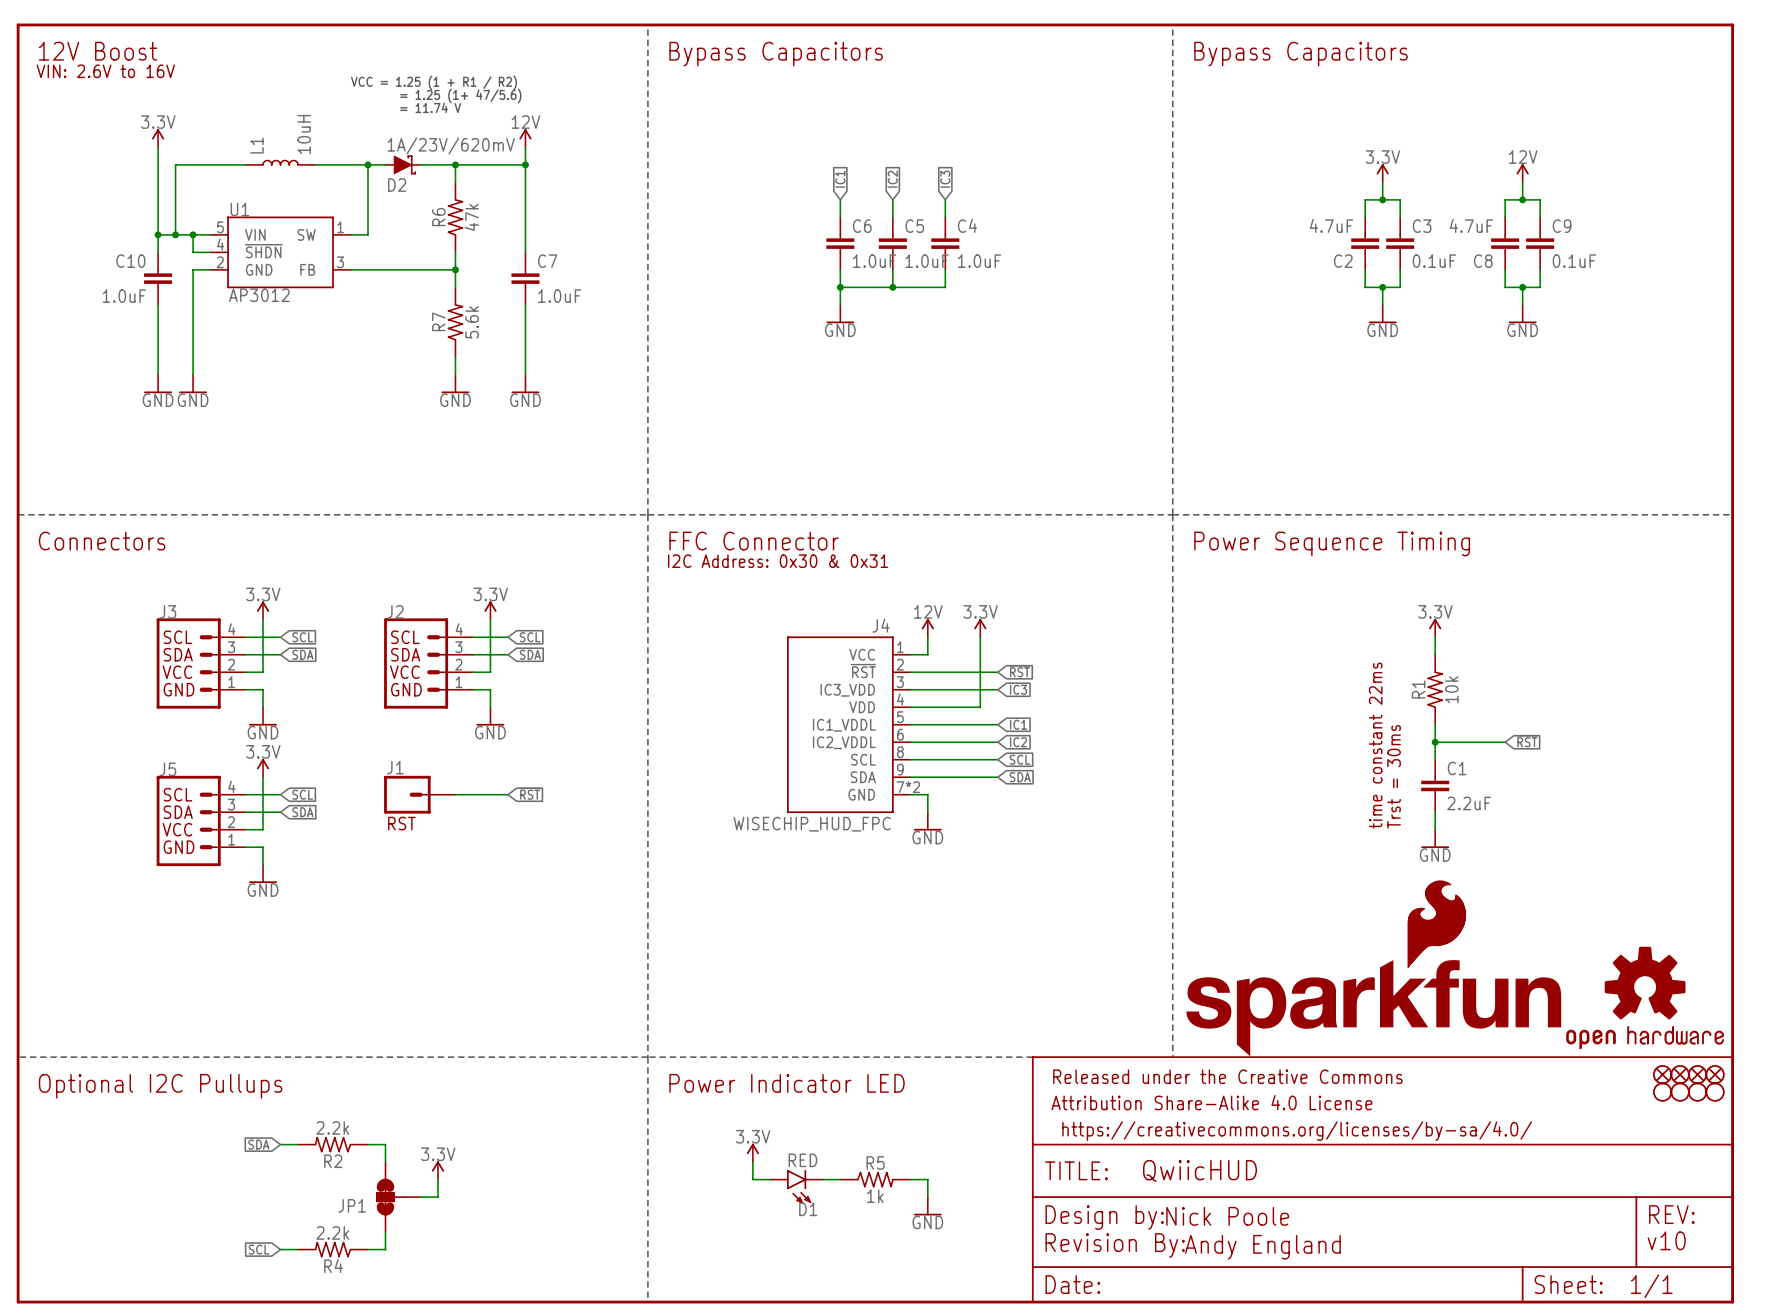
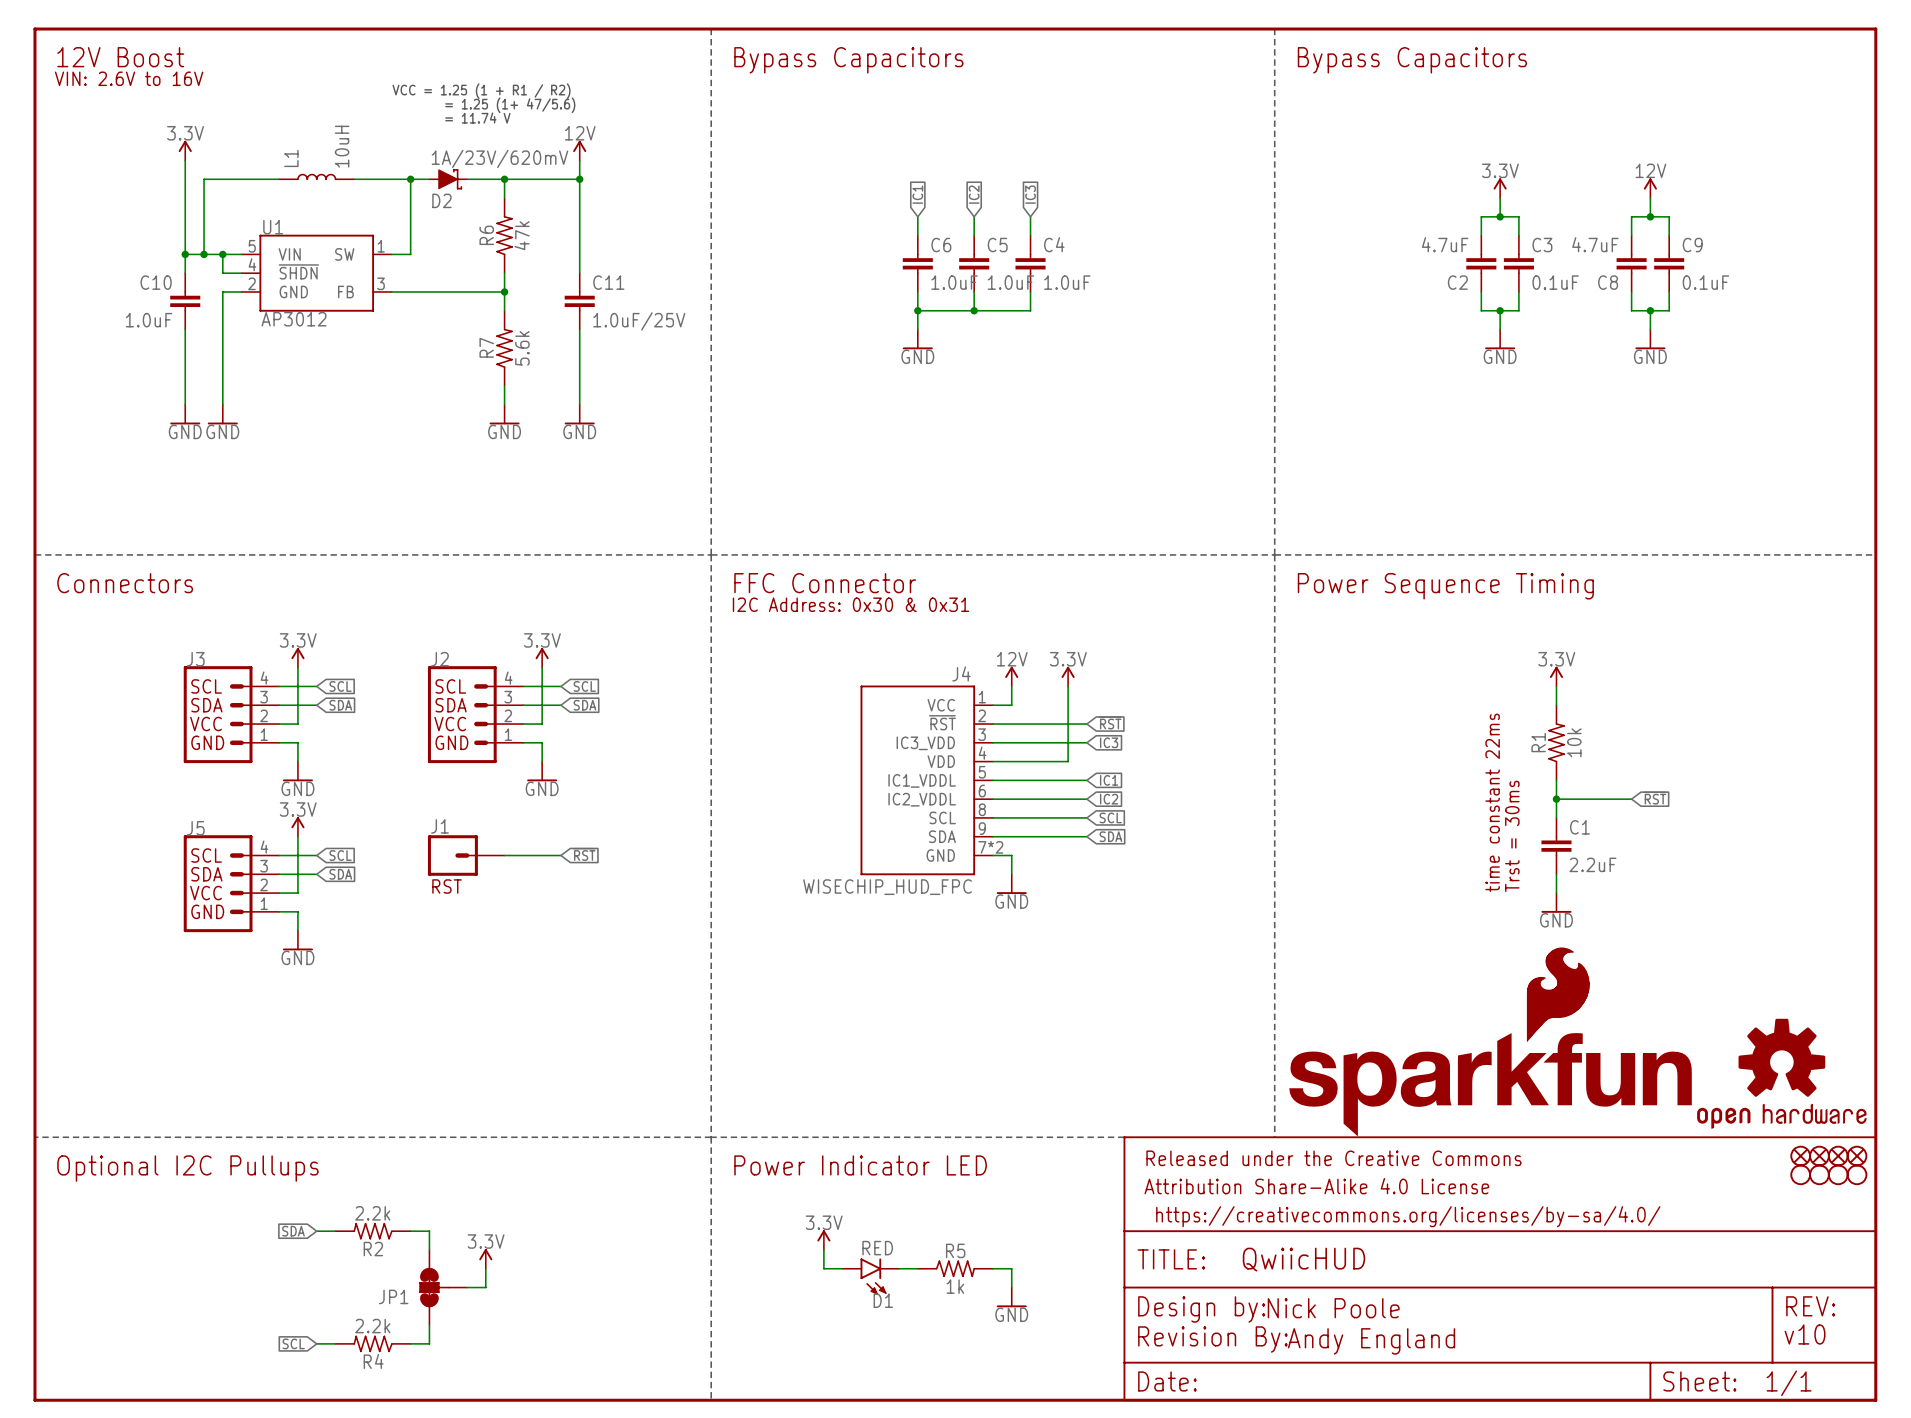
C7 name: C7 (547, 261) -> C11 (608, 282)
C7 value: 1.0uF (559, 296) -> 1.0uF/25V (639, 321)

